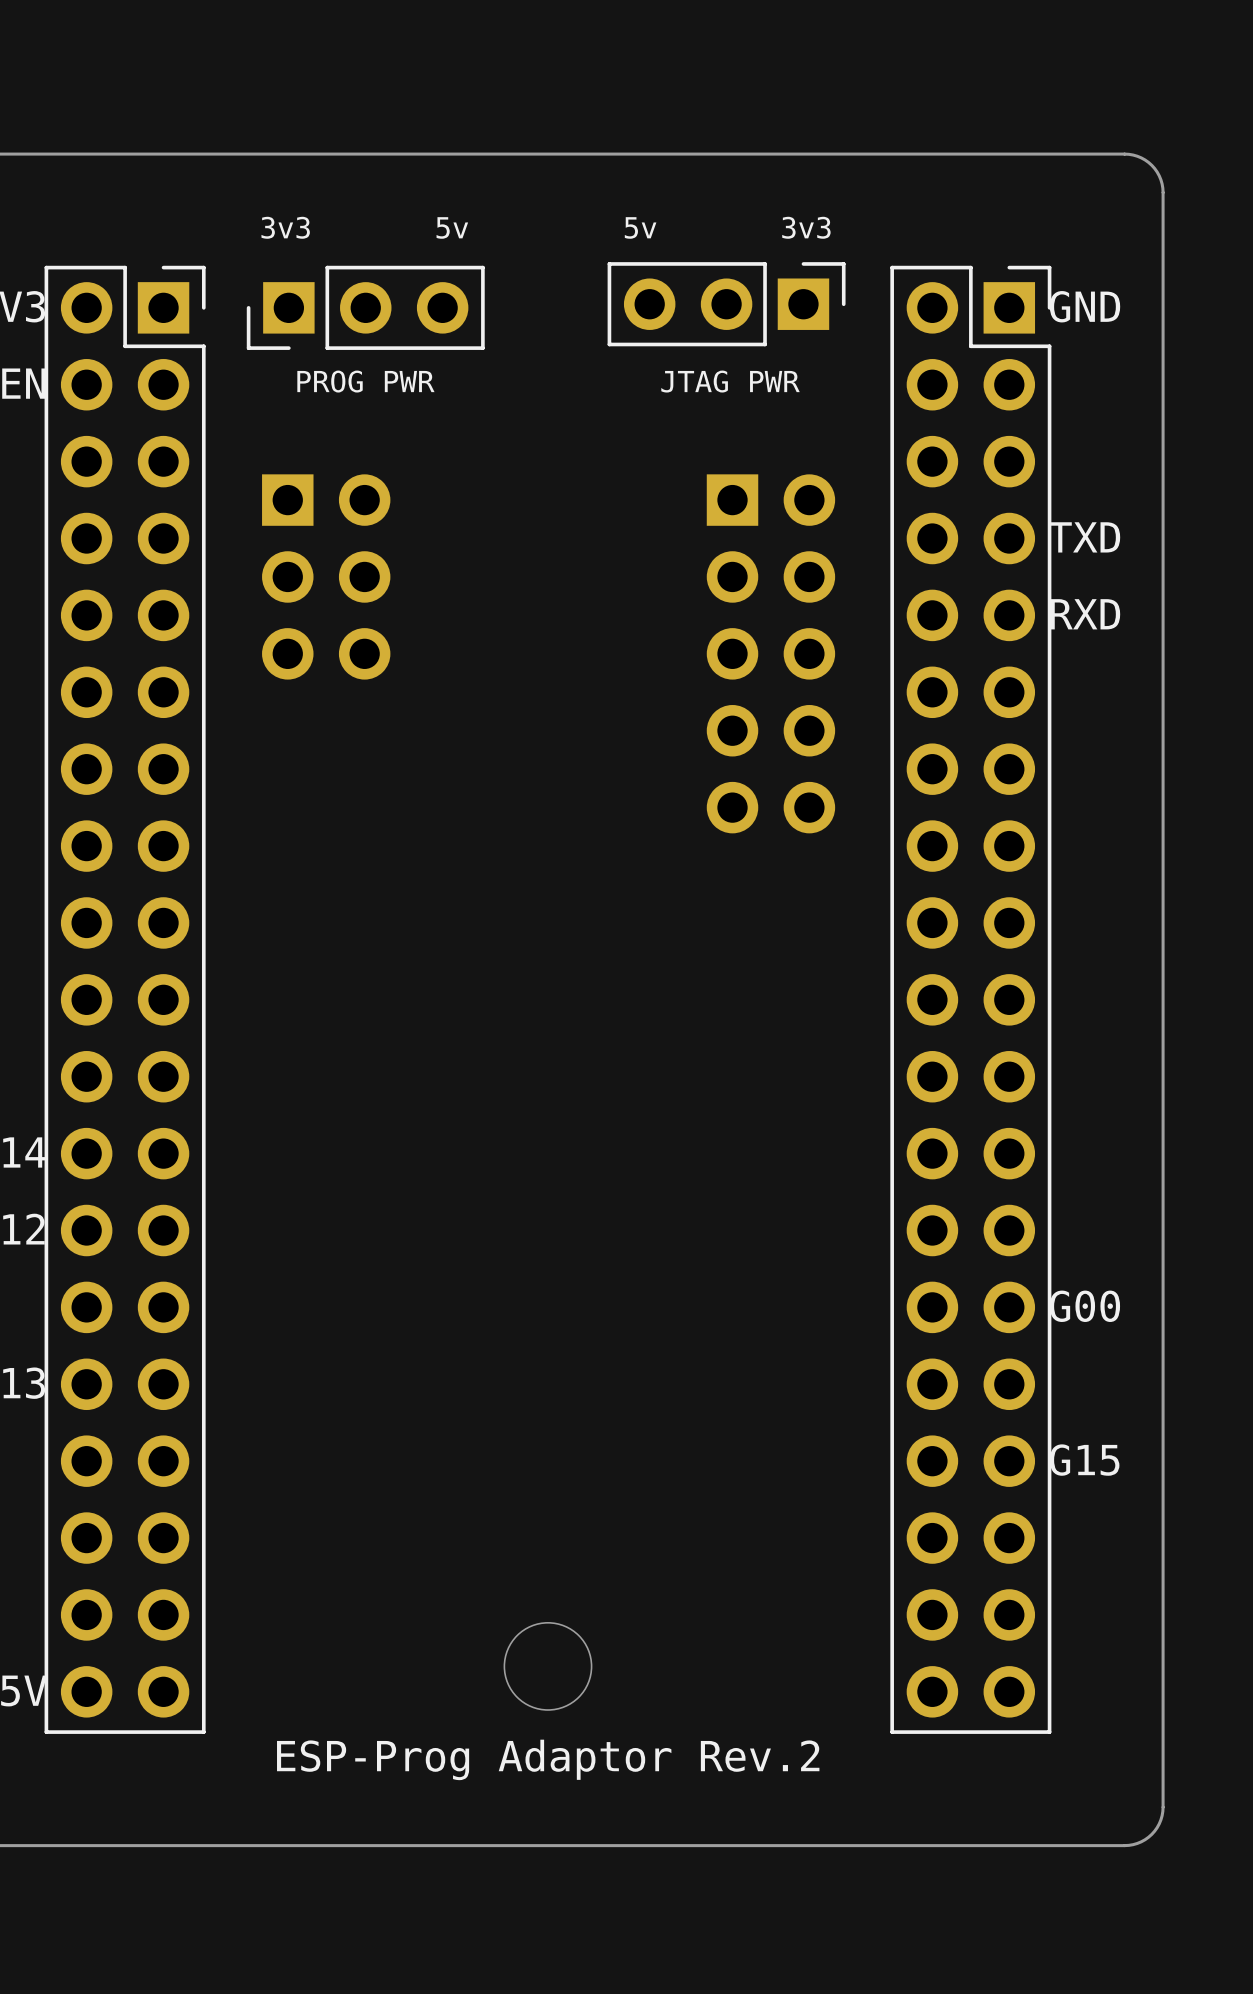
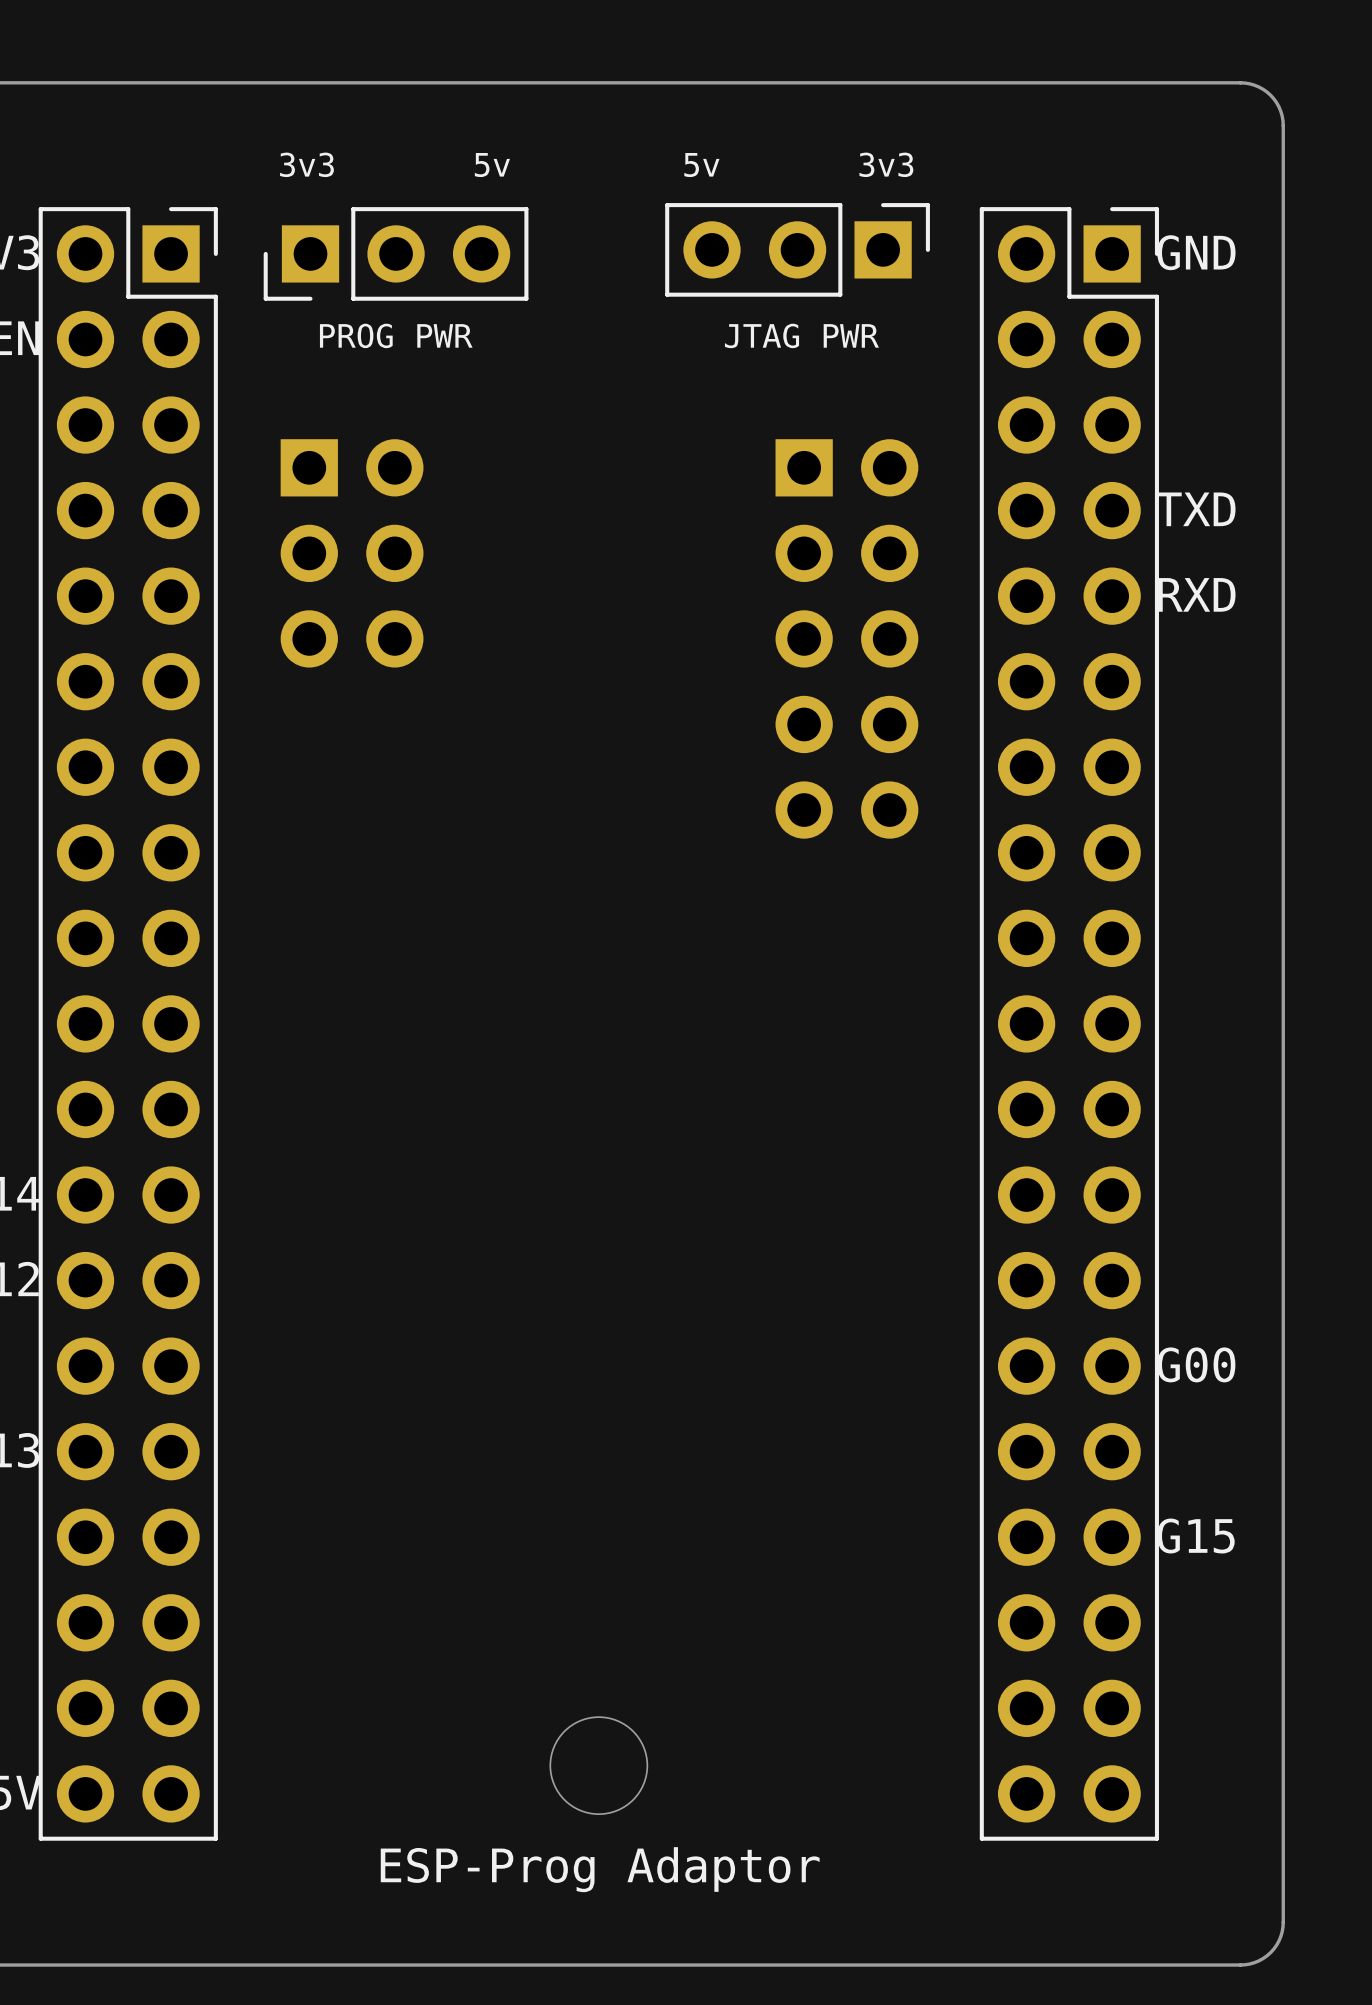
text: ESP-Prog Adaptor Rev.2 (548, 1759) -> ESP-Prog Adaptor (600, 1869)

